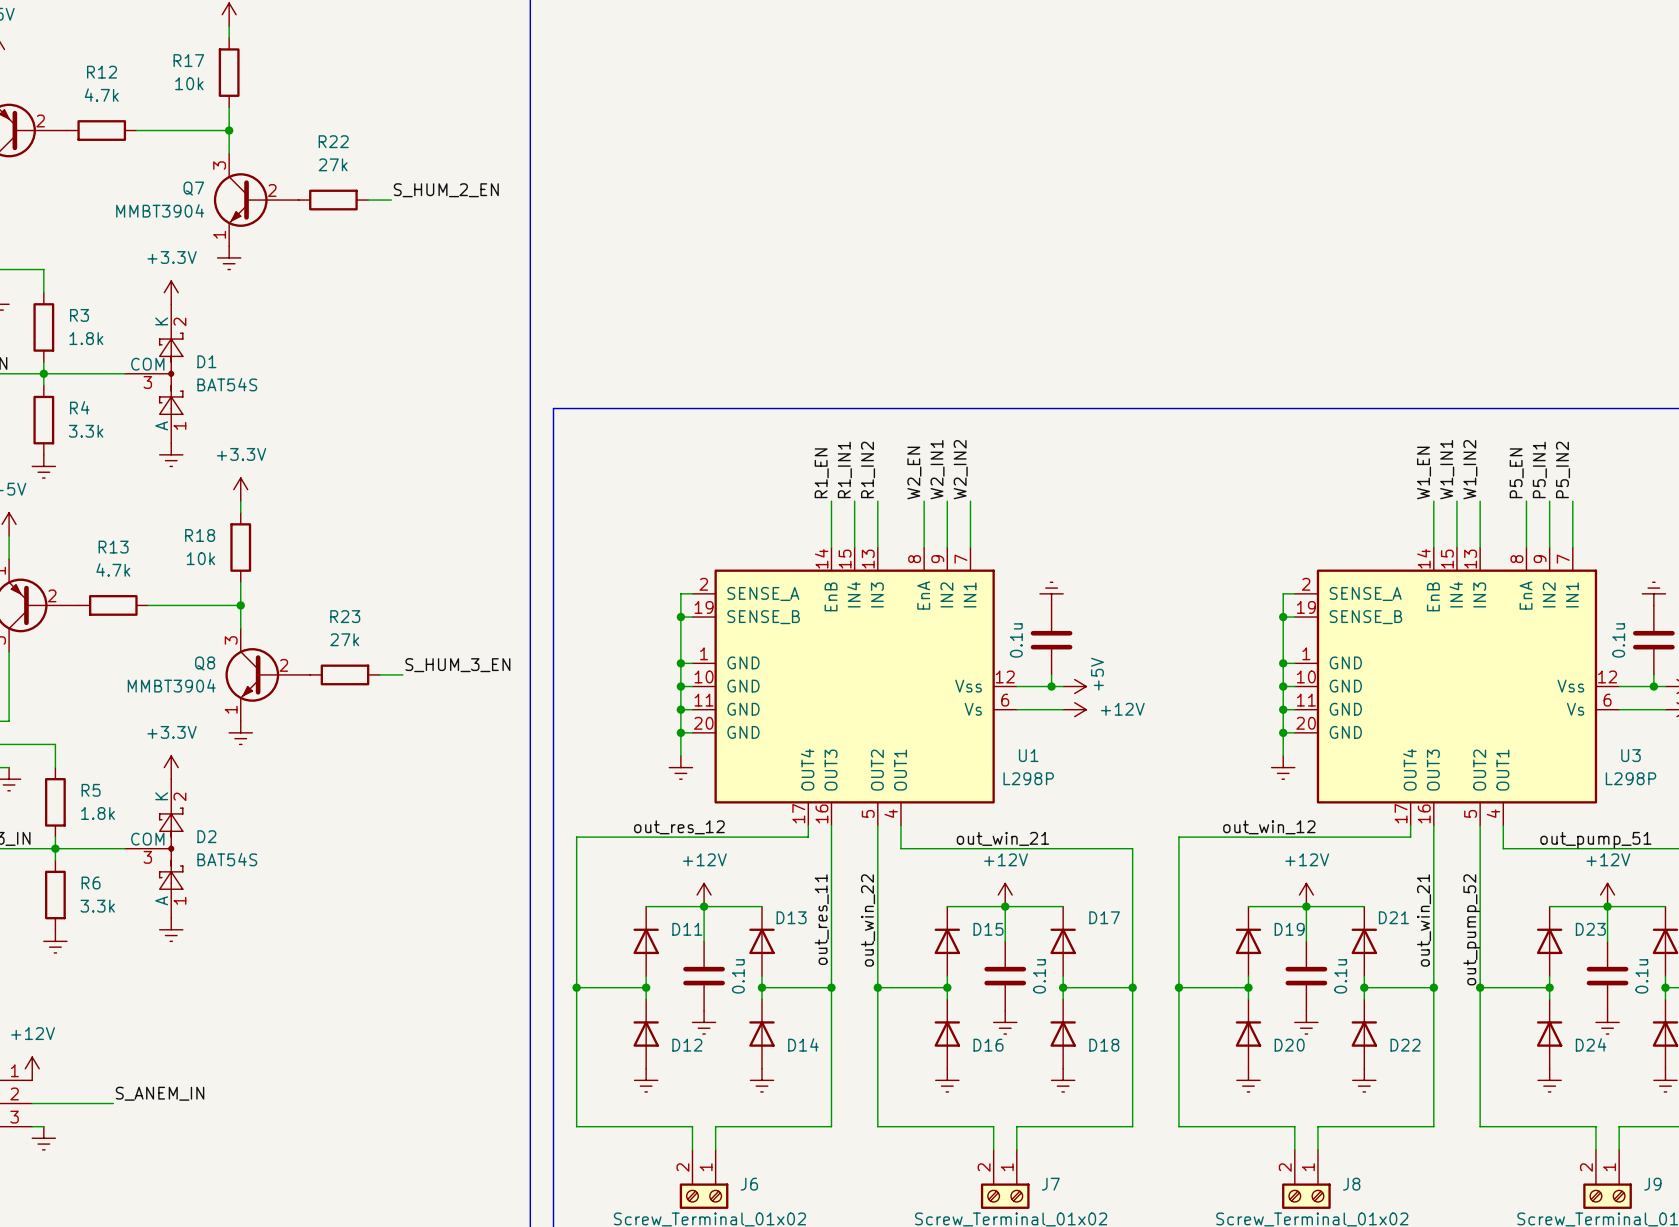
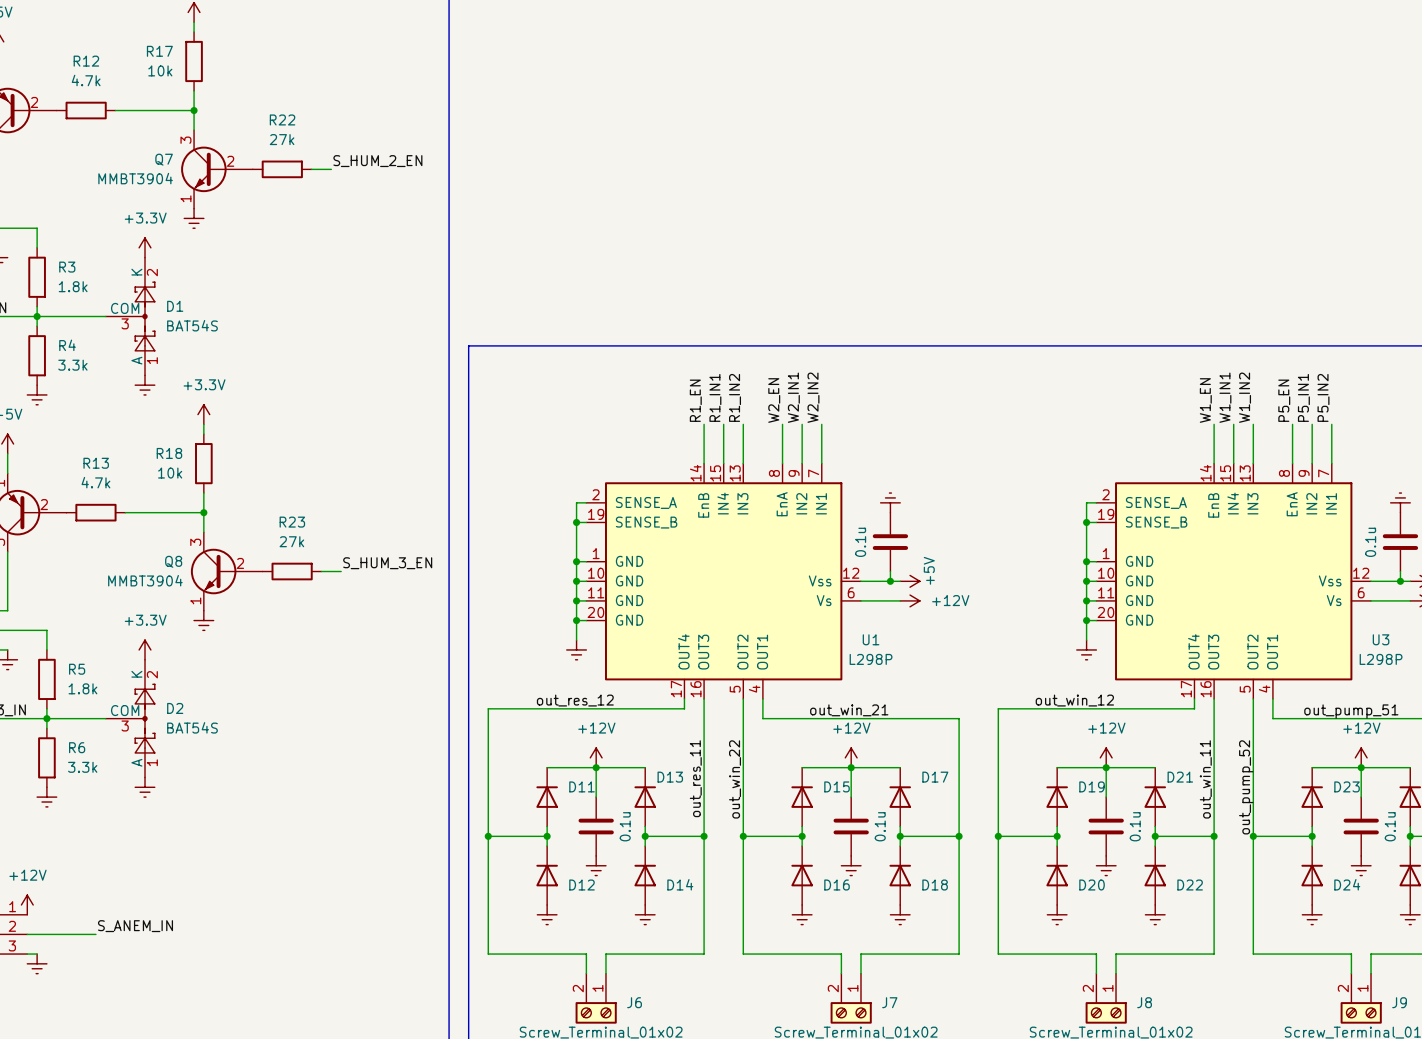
label: out_win_21 (1424, 920) -> out_win_11 (1205, 779)

